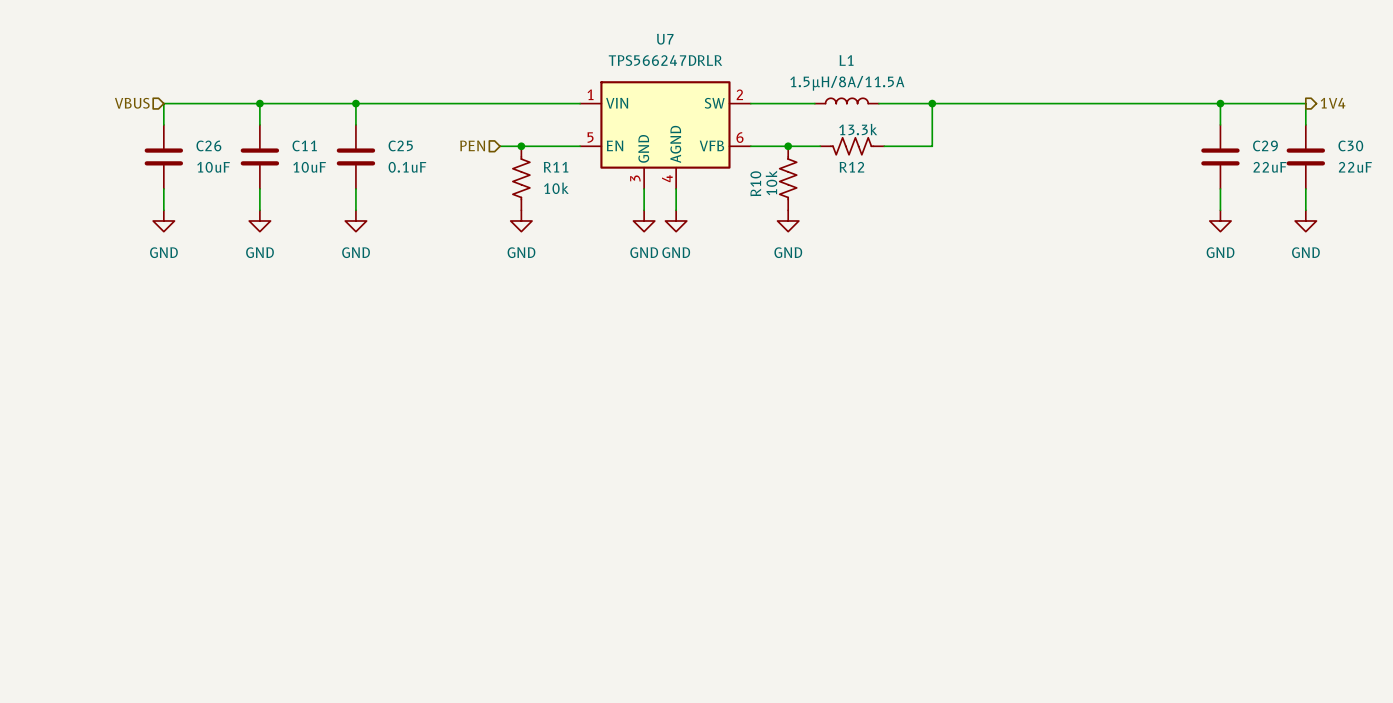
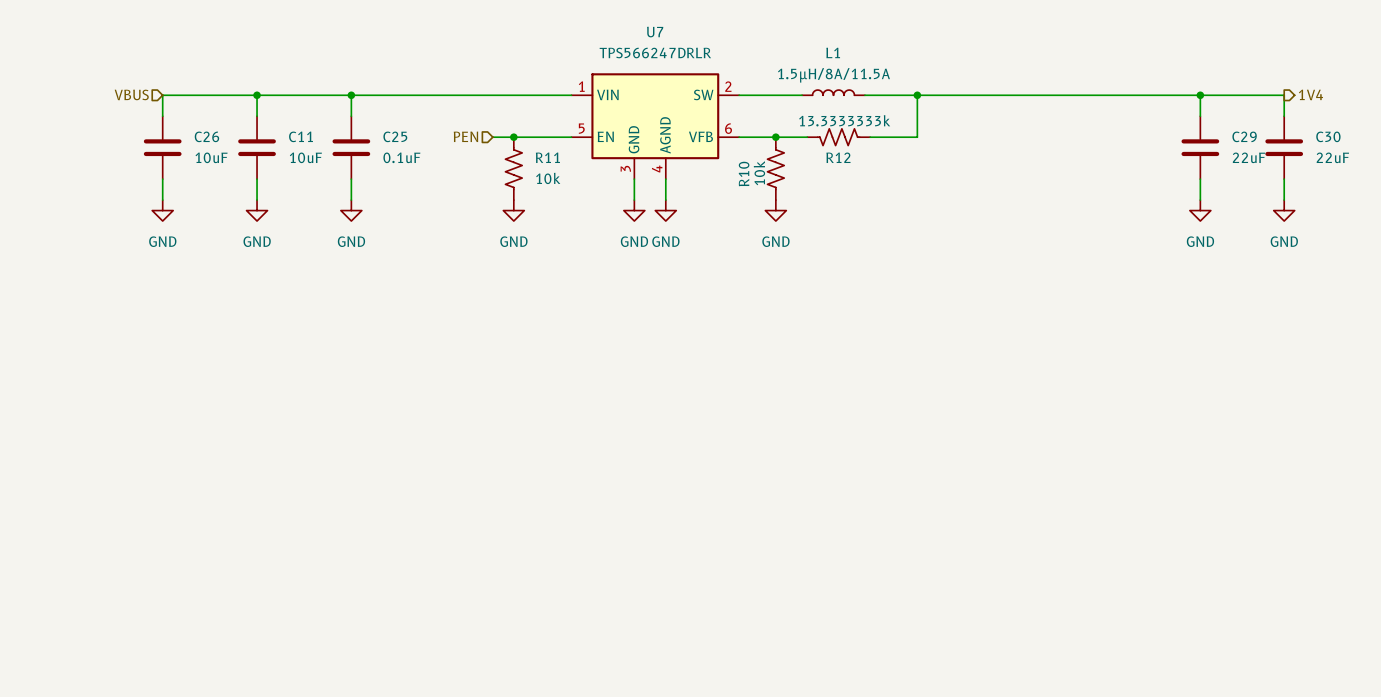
R12 value: 13.3k (858, 129) -> 13.3333333k (844, 120)

